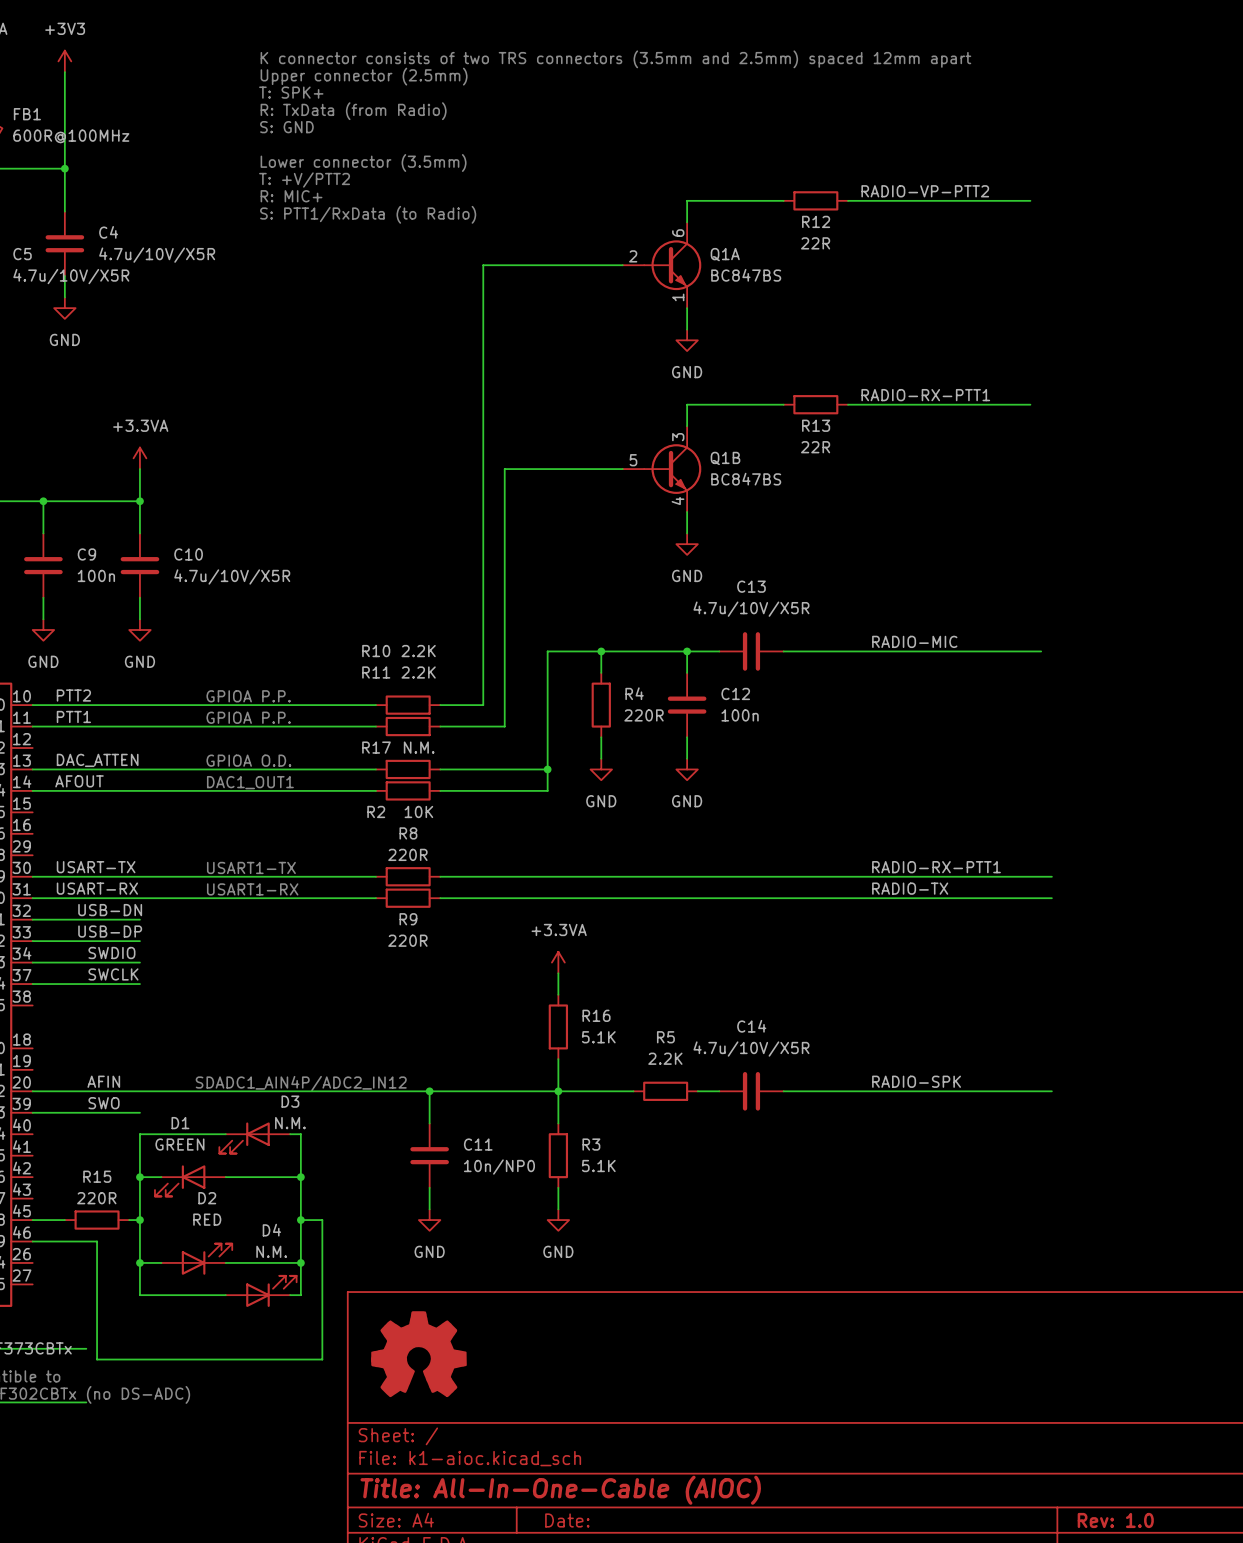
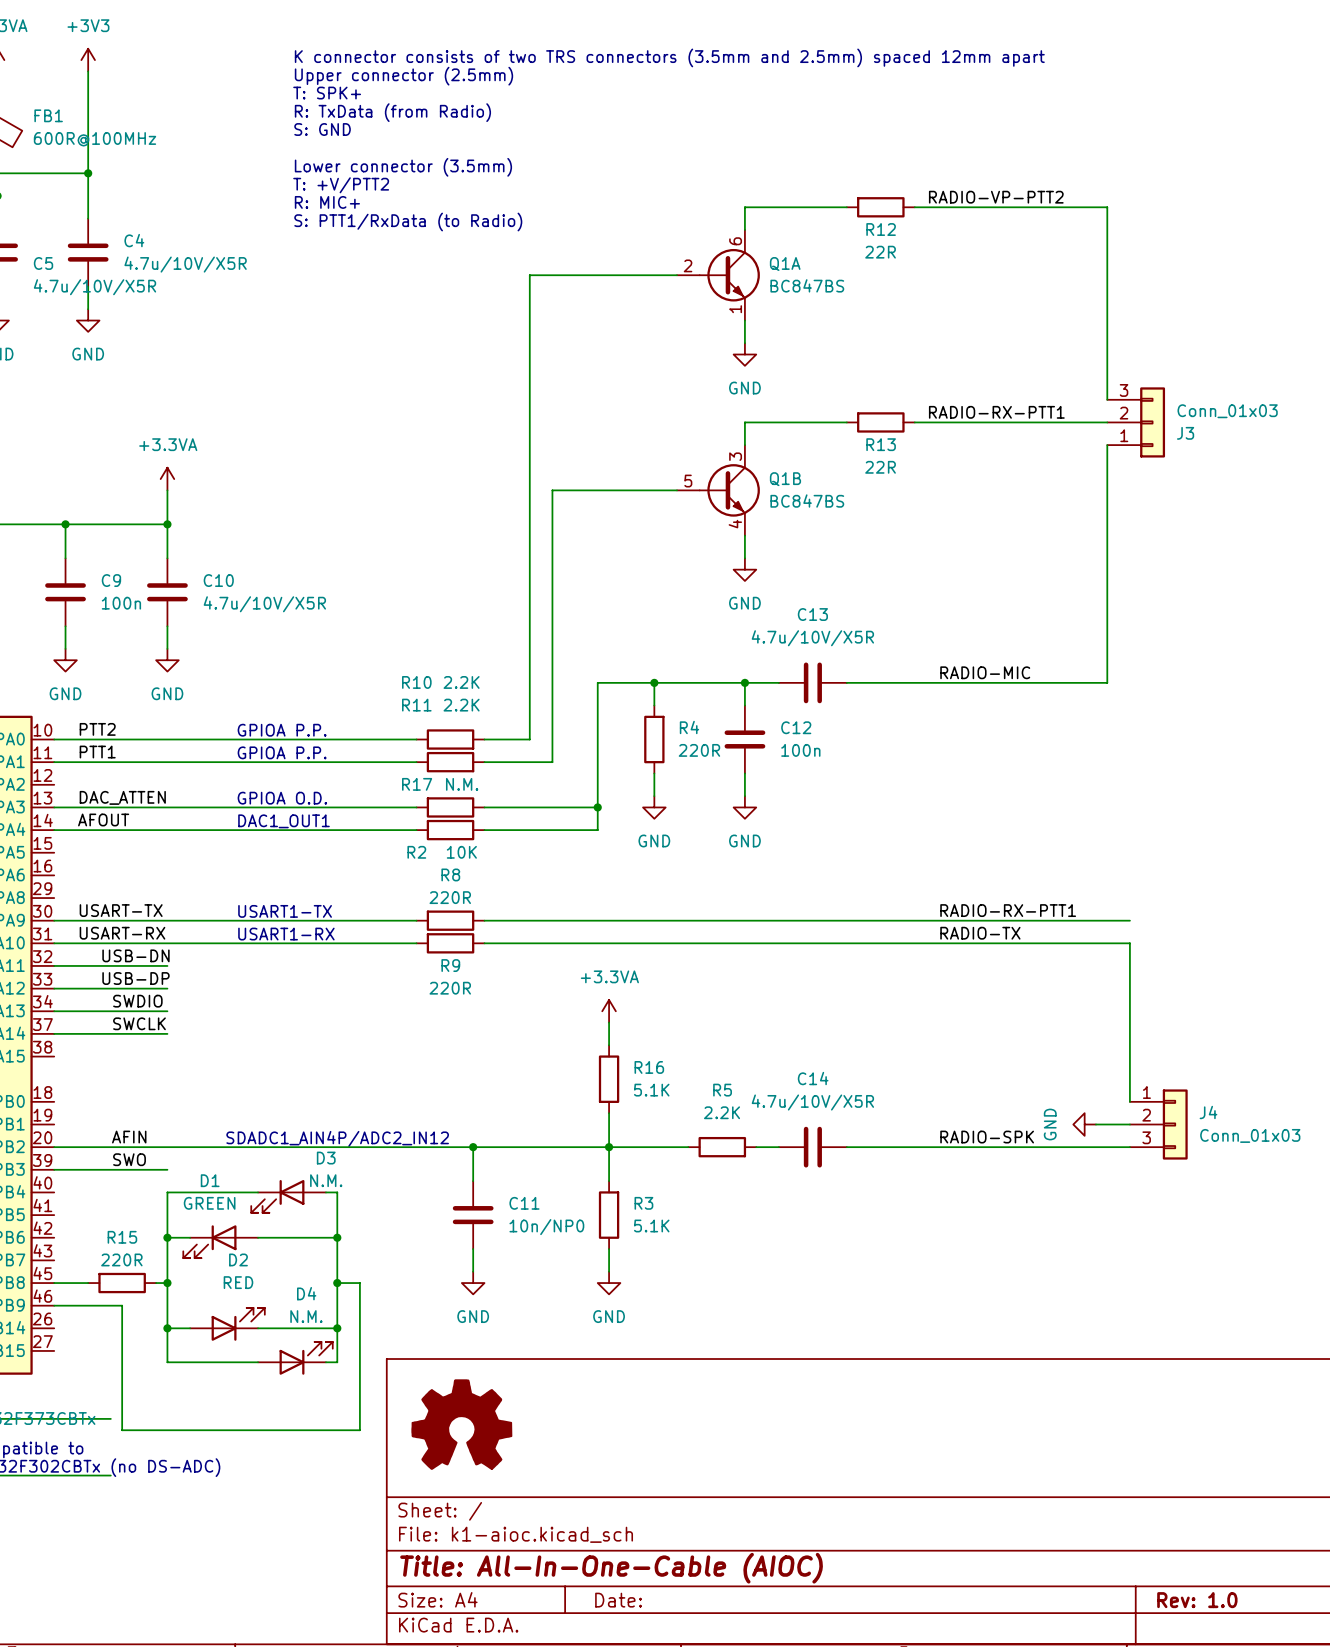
wire: none -> (1107, 207) (1107, 399)
J3: none -> Conn_01x03 (1136, 422)
wire: (1030, 651) (1041, 651) -> (1107, 682) (1107, 445)
wire: none -> (1129, 943) (1129, 1101)
power symbol: none -> GND (1084, 1124)
wire: none -> (1095, 1124) (1129, 1124)
J4: none -> Conn_01x03 (1158, 1124)

